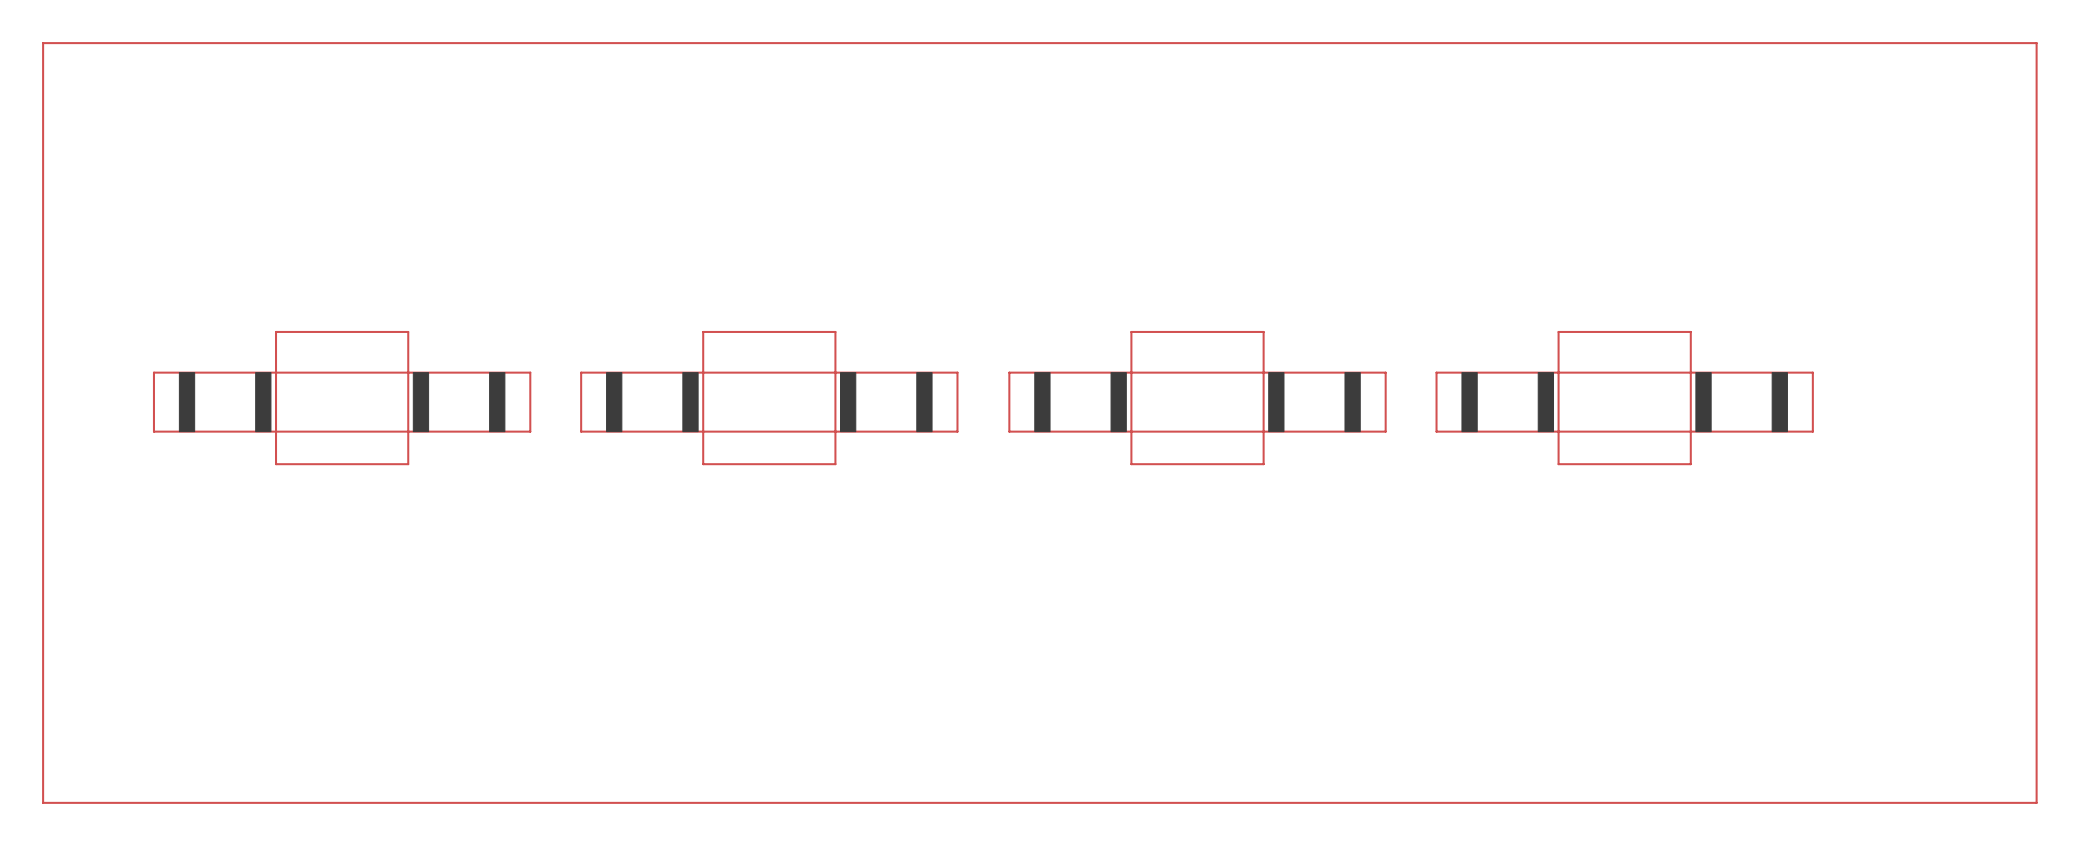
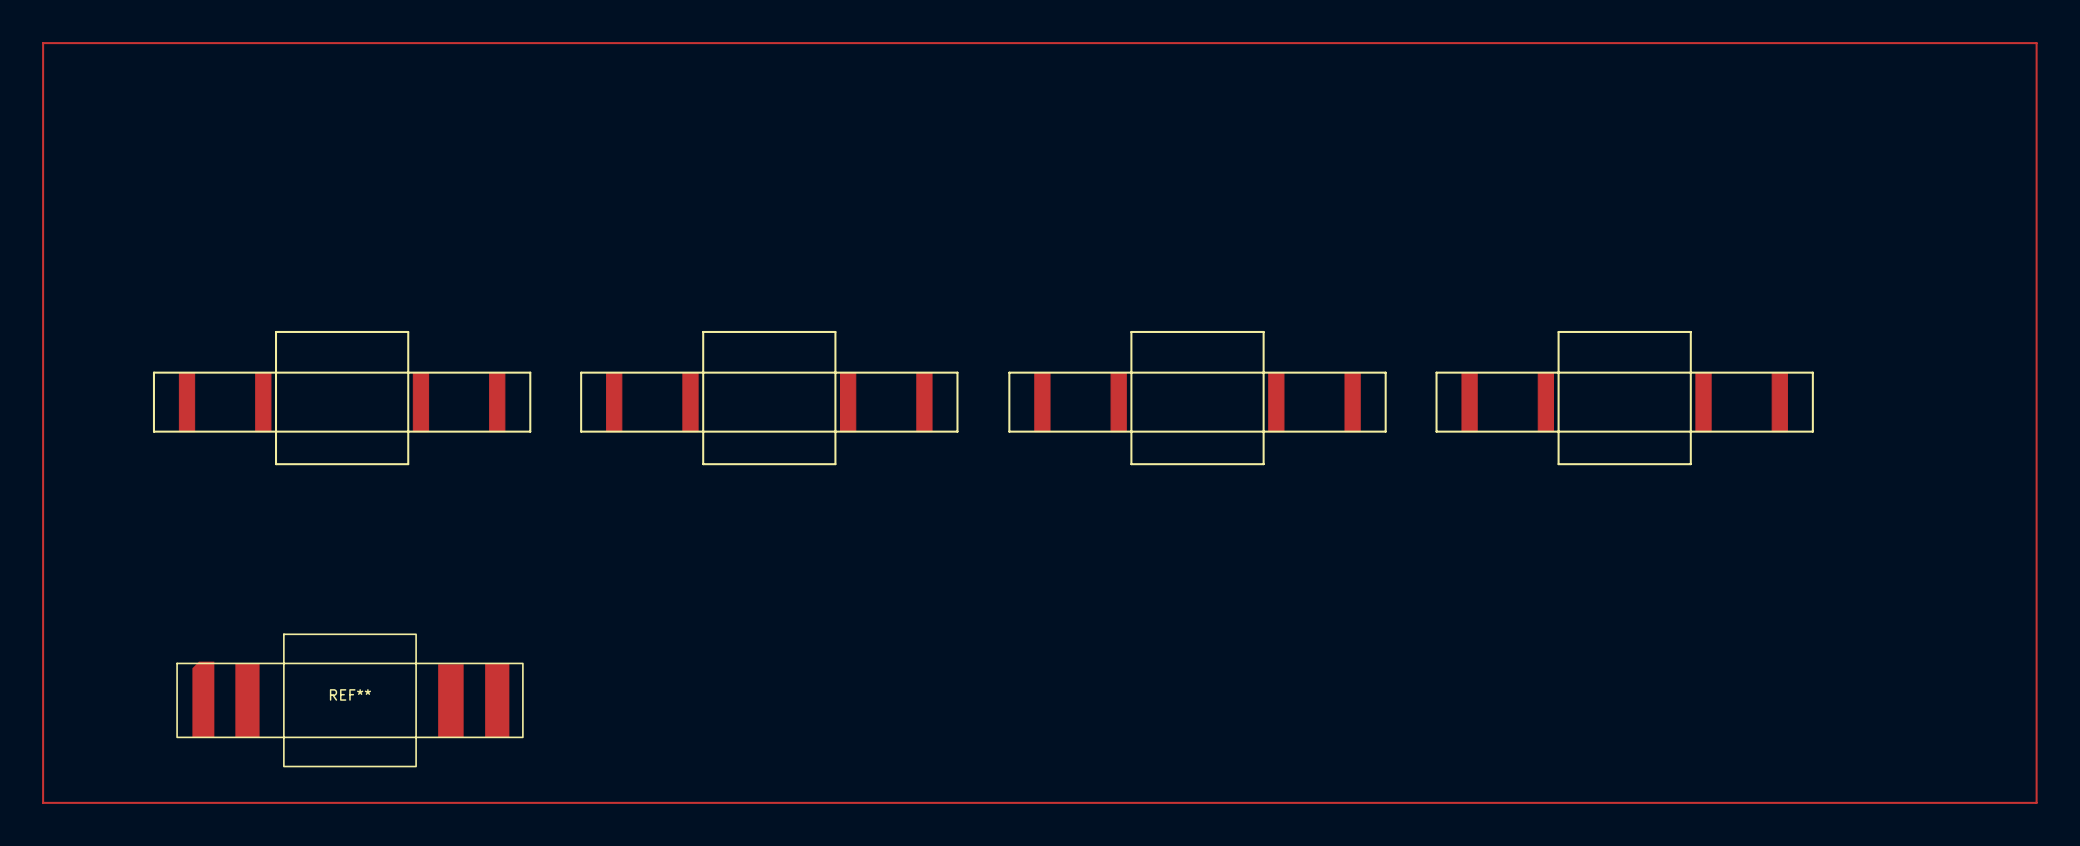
track: (276, 331) (408, 331) (408, 464) (276, 464) (276, 331) -> none
line: none -> (276, 331) (408, 331) (408, 464) (276, 464) (276, 331)
track: (703, 331) (835, 331) (835, 464) (703, 464) (703, 331) -> none
line: none -> (703, 331) (835, 331) (835, 464) (703, 464) (703, 331)
track: (1131, 331) (1263, 331) (1263, 464) (1131, 464) (1131, 331) -> none
line: none -> (1131, 331) (1263, 331) (1263, 464) (1131, 464) (1131, 331)
track: (1558, 331) (1690, 331) (1690, 464) (1558, 464) (1558, 331) -> none
line: none -> (1558, 331) (1690, 331) (1690, 464) (1558, 464) (1558, 331)
track: (153, 372) (530, 372) (530, 431) (153, 431) (153, 372) -> none
line: none -> (153, 372) (530, 372) (530, 431) (153, 431) (153, 372)
drawing shape: [178, 372, 196, 433] -> [178, 372, 196, 433]
drawing shape: [255, 372, 272, 433] -> [255, 372, 272, 433]
drawing shape: [412, 372, 430, 433] -> [412, 372, 430, 433]
drawing shape: [489, 372, 506, 433] -> [489, 372, 506, 433]
track: (581, 372) (957, 372) (957, 431) (581, 431) (581, 372) -> none
line: none -> (581, 372) (957, 372) (957, 431) (581, 431) (581, 372)
drawing shape: [606, 372, 623, 433] -> [606, 372, 623, 433]
drawing shape: [682, 372, 699, 433] -> [682, 372, 699, 433]
drawing shape: [840, 372, 857, 433] -> [840, 372, 857, 433]
drawing shape: [916, 372, 933, 433] -> [916, 372, 933, 433]
track: (1009, 372) (1385, 372) (1385, 431) (1009, 431) (1009, 372) -> none
line: none -> (1009, 372) (1385, 372) (1385, 431) (1009, 431) (1009, 372)
drawing shape: [1034, 372, 1051, 433] -> [1034, 372, 1051, 433]
drawing shape: [1110, 372, 1127, 433] -> [1110, 372, 1127, 433]
drawing shape: [1268, 372, 1285, 433] -> [1268, 372, 1285, 433]
drawing shape: [1344, 372, 1361, 433] -> [1344, 372, 1361, 433]
track: (1436, 372) (1812, 372) (1812, 431) (1436, 431) (1436, 372) -> none
line: none -> (1436, 372) (1812, 372) (1812, 431) (1436, 431) (1436, 372)
drawing shape: [1461, 372, 1478, 433] -> [1461, 372, 1478, 433]
drawing shape: [1537, 372, 1555, 433] -> [1537, 372, 1555, 433]
drawing shape: [1695, 372, 1712, 433] -> [1695, 372, 1712, 433]
drawing shape: [1771, 372, 1788, 433] -> [1771, 372, 1788, 433]
REF**: none -> (349, 700)

